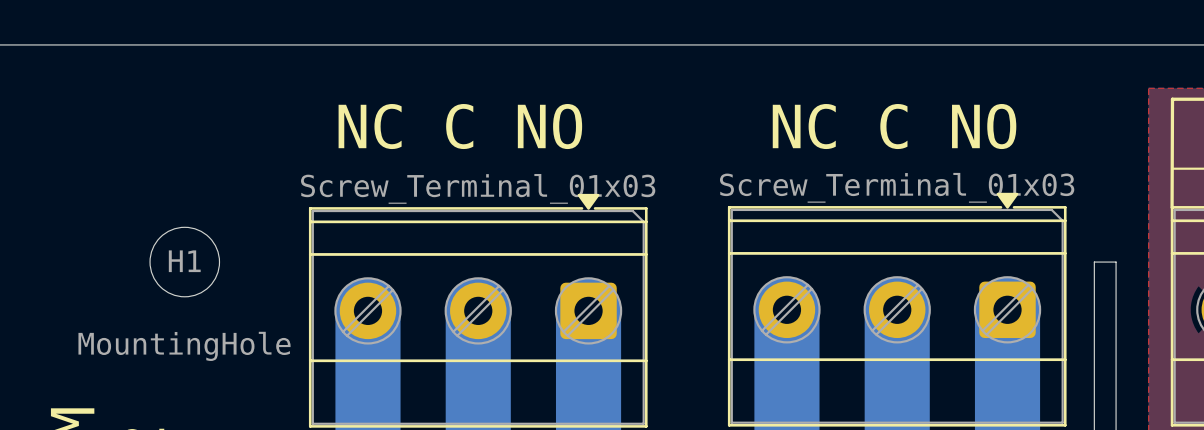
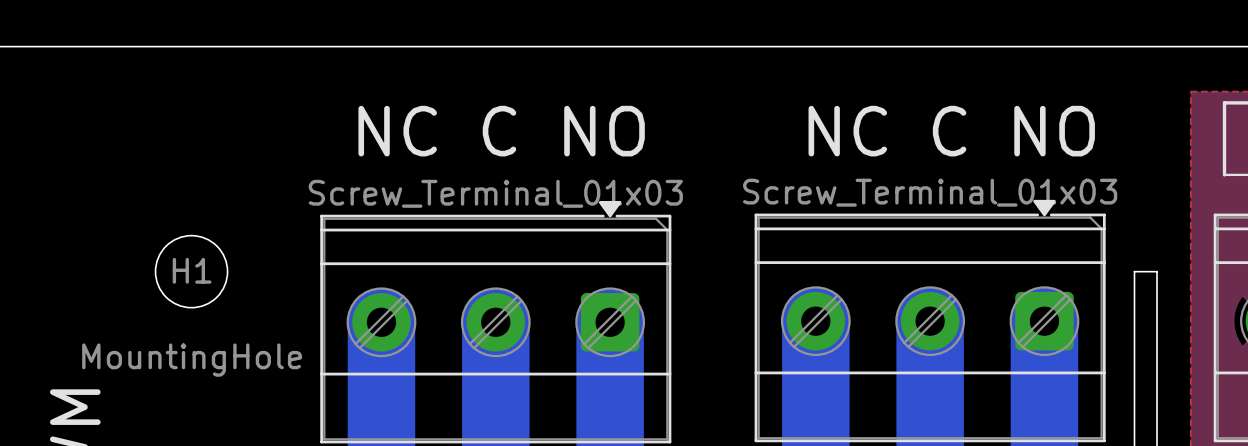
line: (1181, 99) (1172, 99) (1172, 207) -> (1224, 102) (1224, 174)
line: (1172, 168) (1181, 168) -> none

